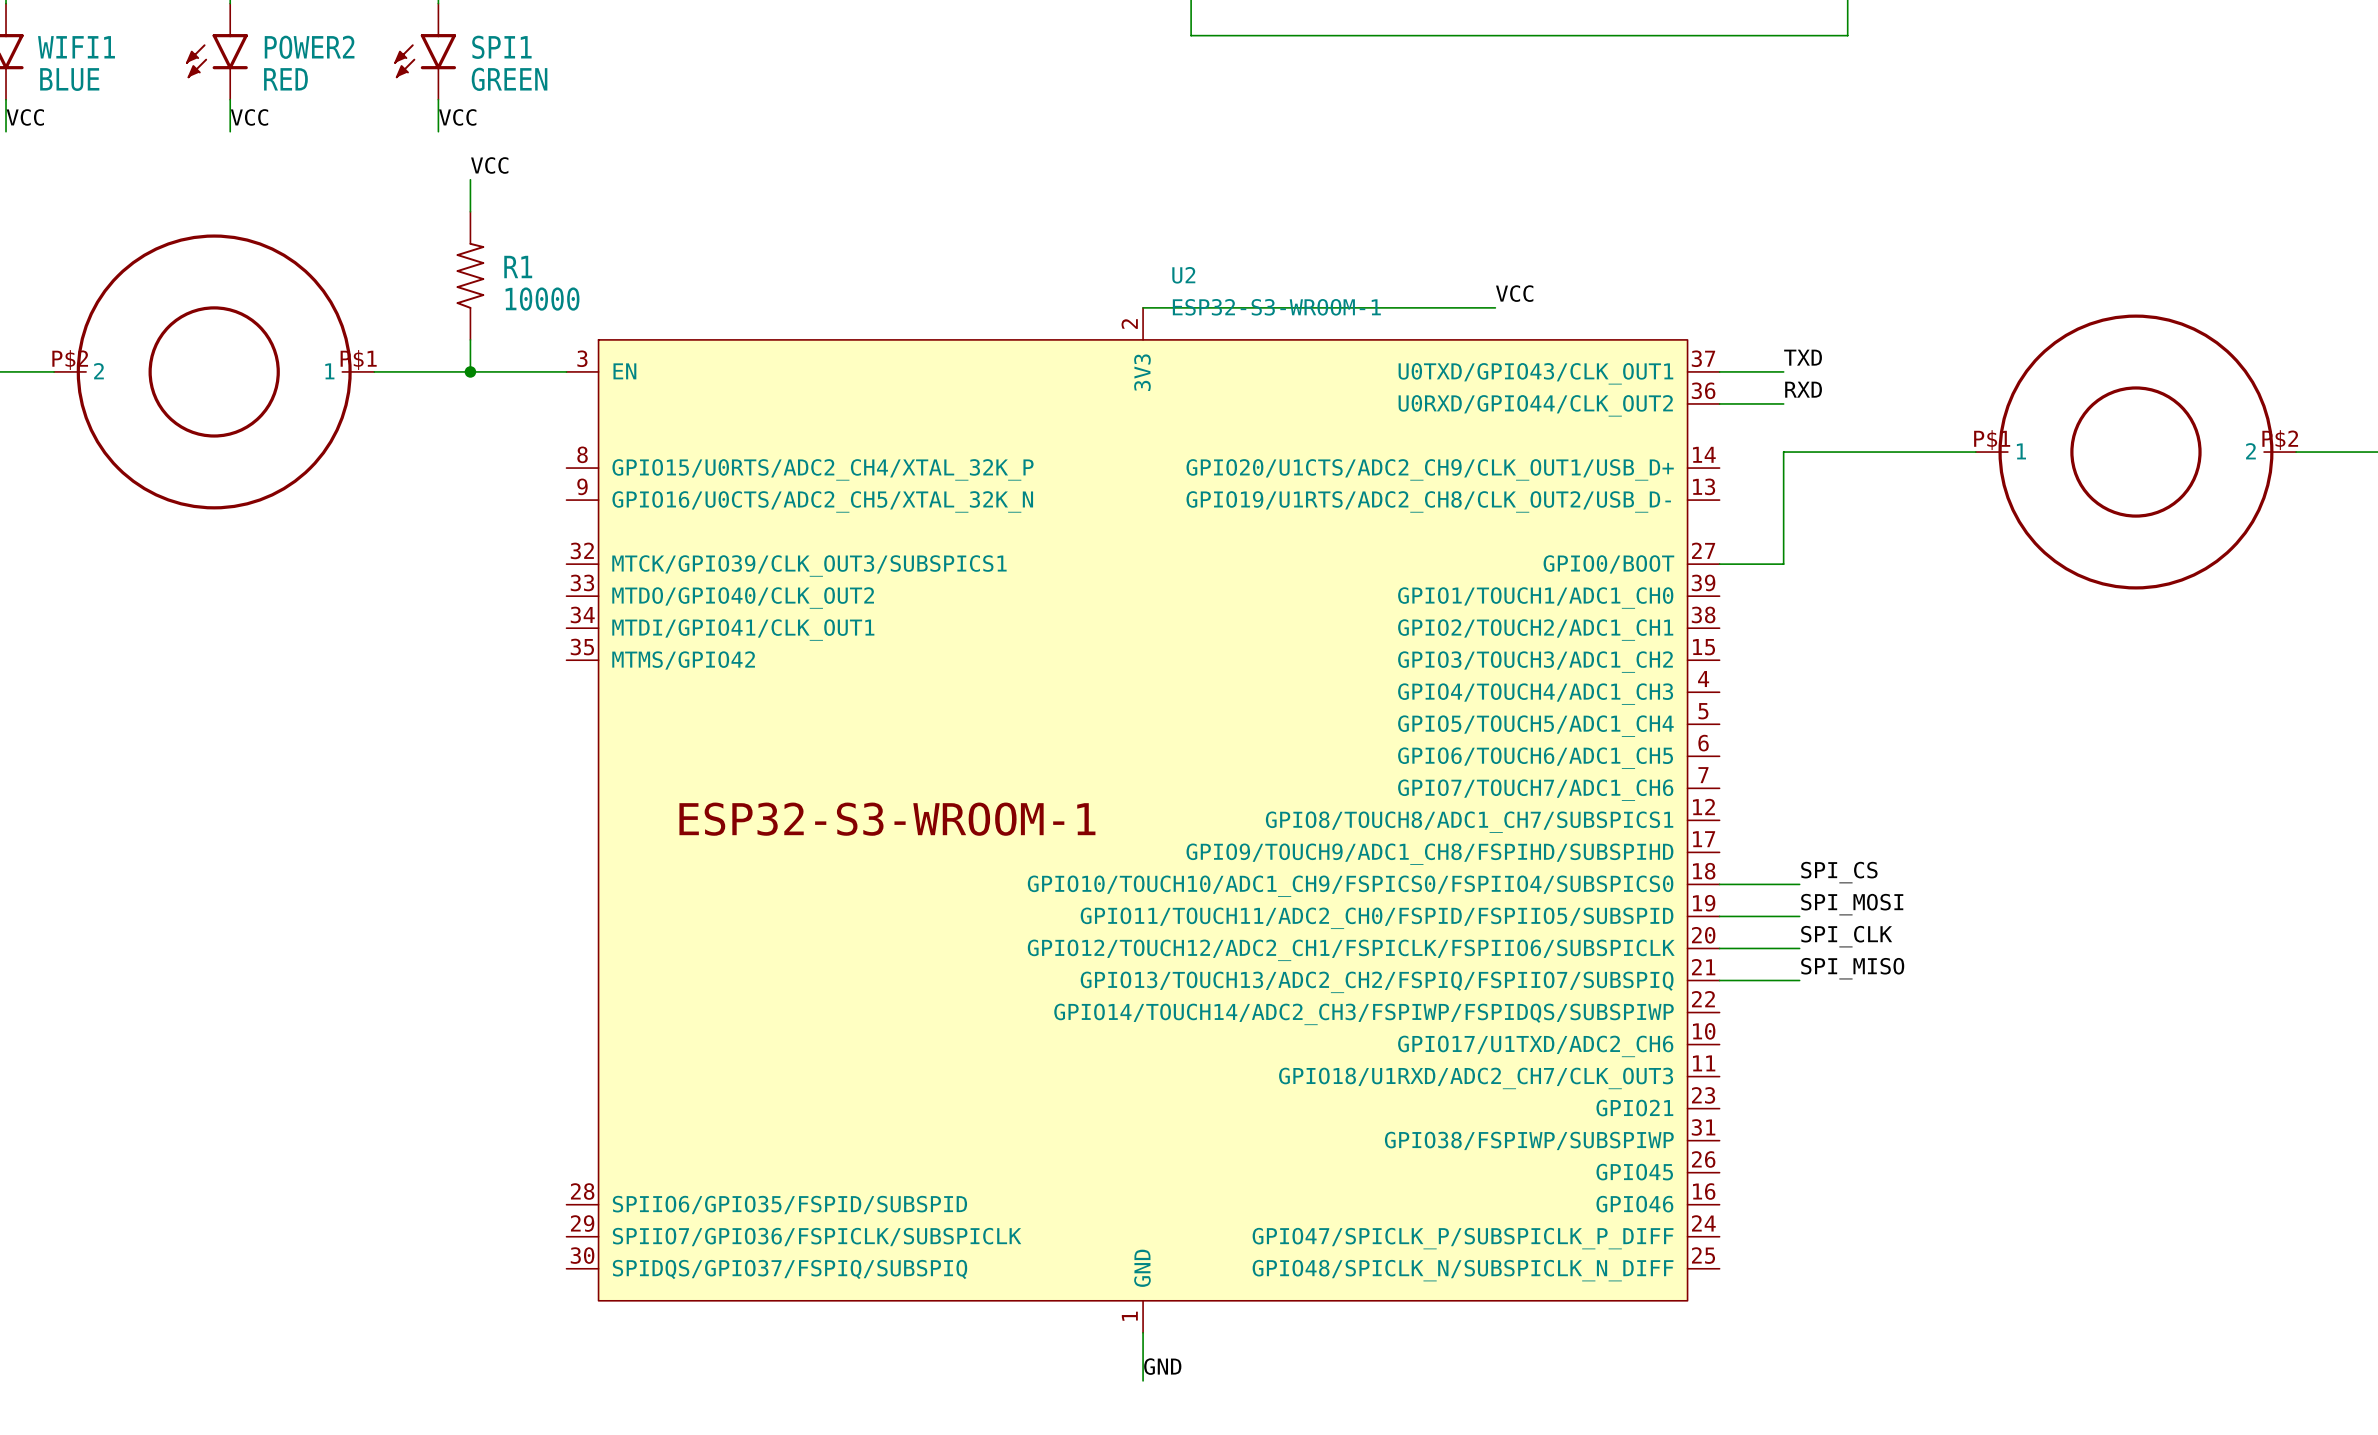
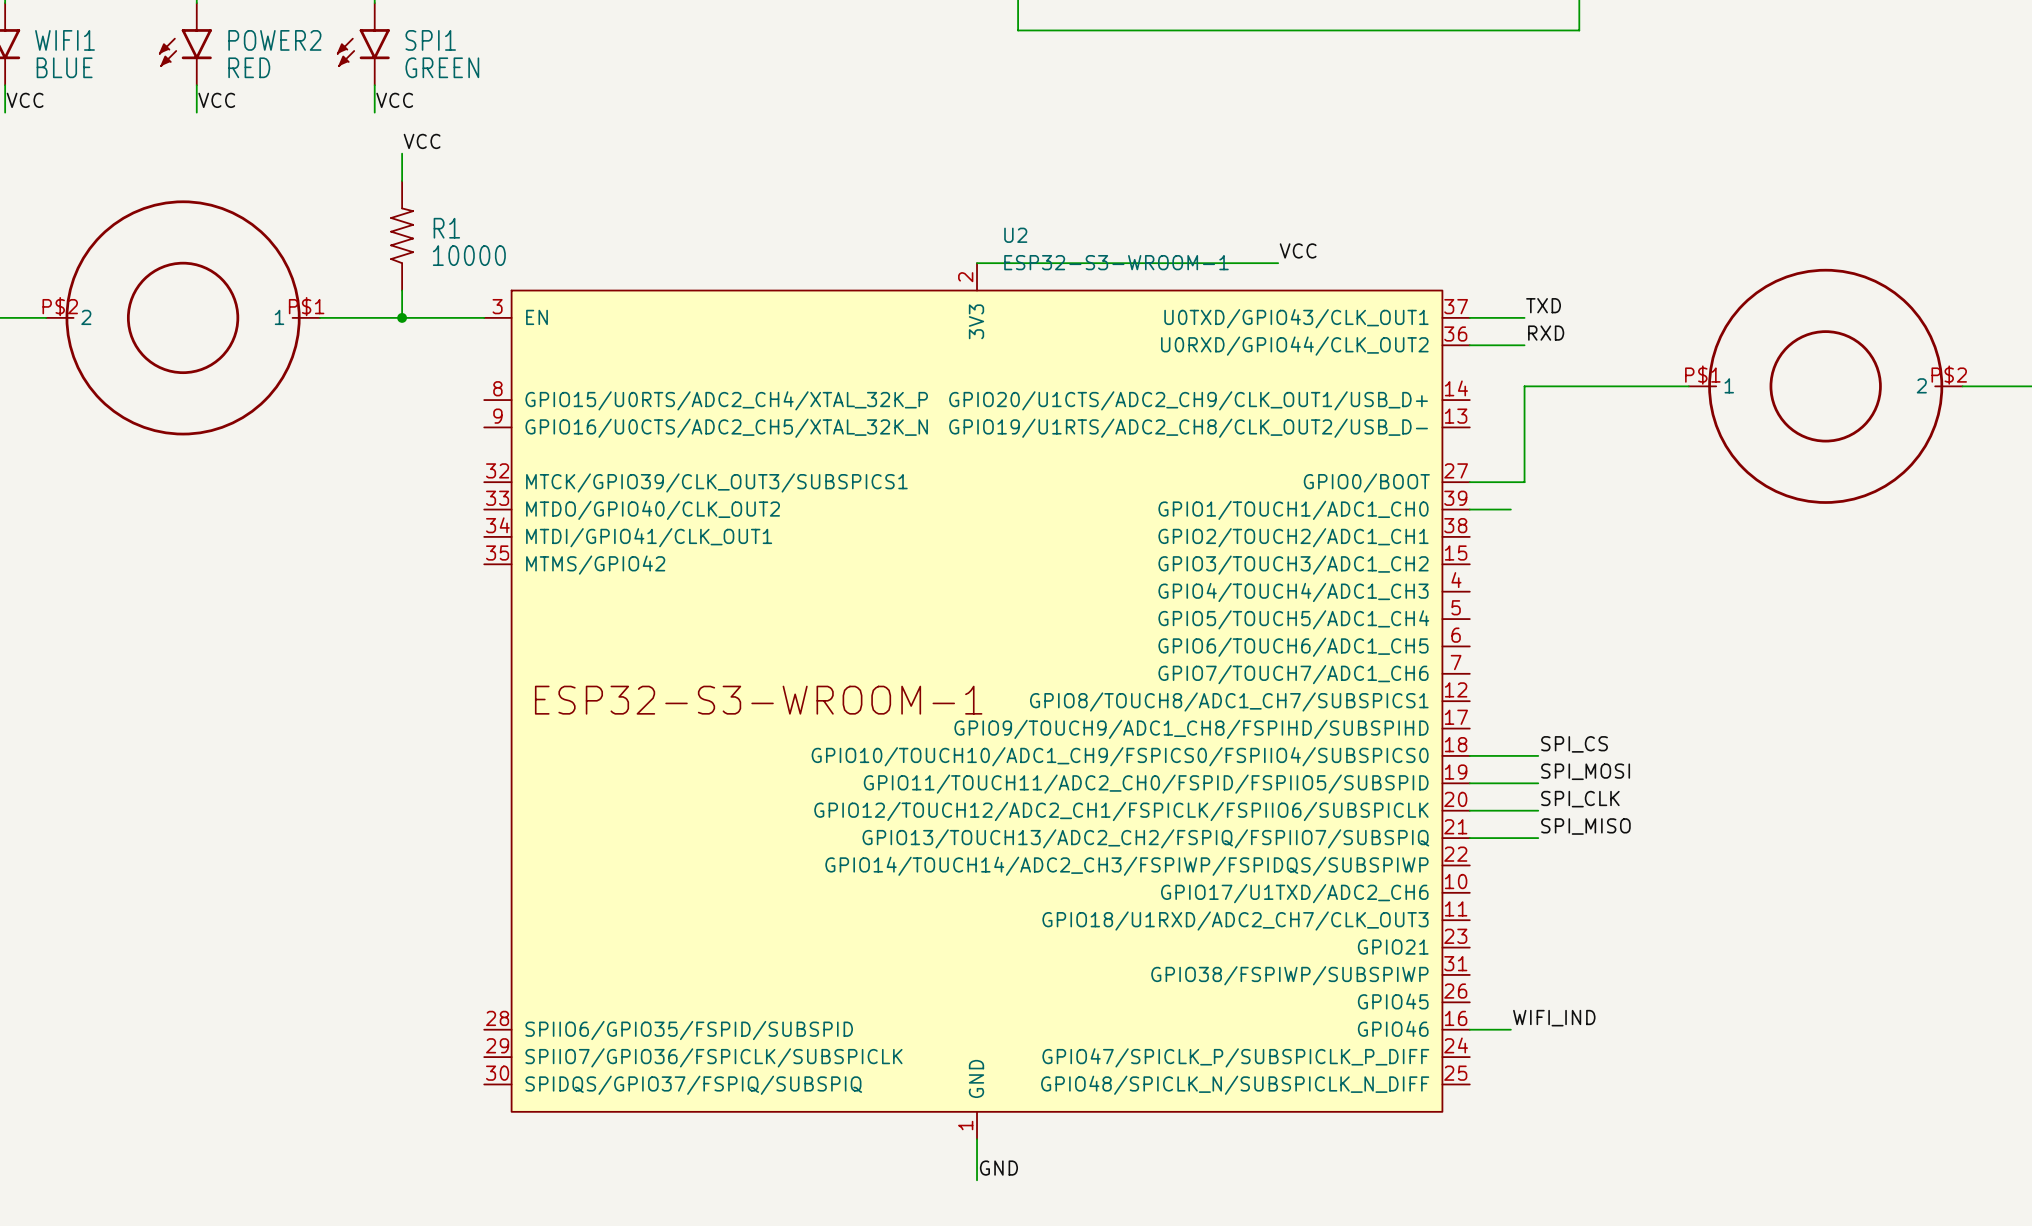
wire: none -> (1469, 509) (1510, 509)
label: none -> WIFI_IND (1554, 1018)
wire: none -> (1469, 1029) (1510, 1029)

